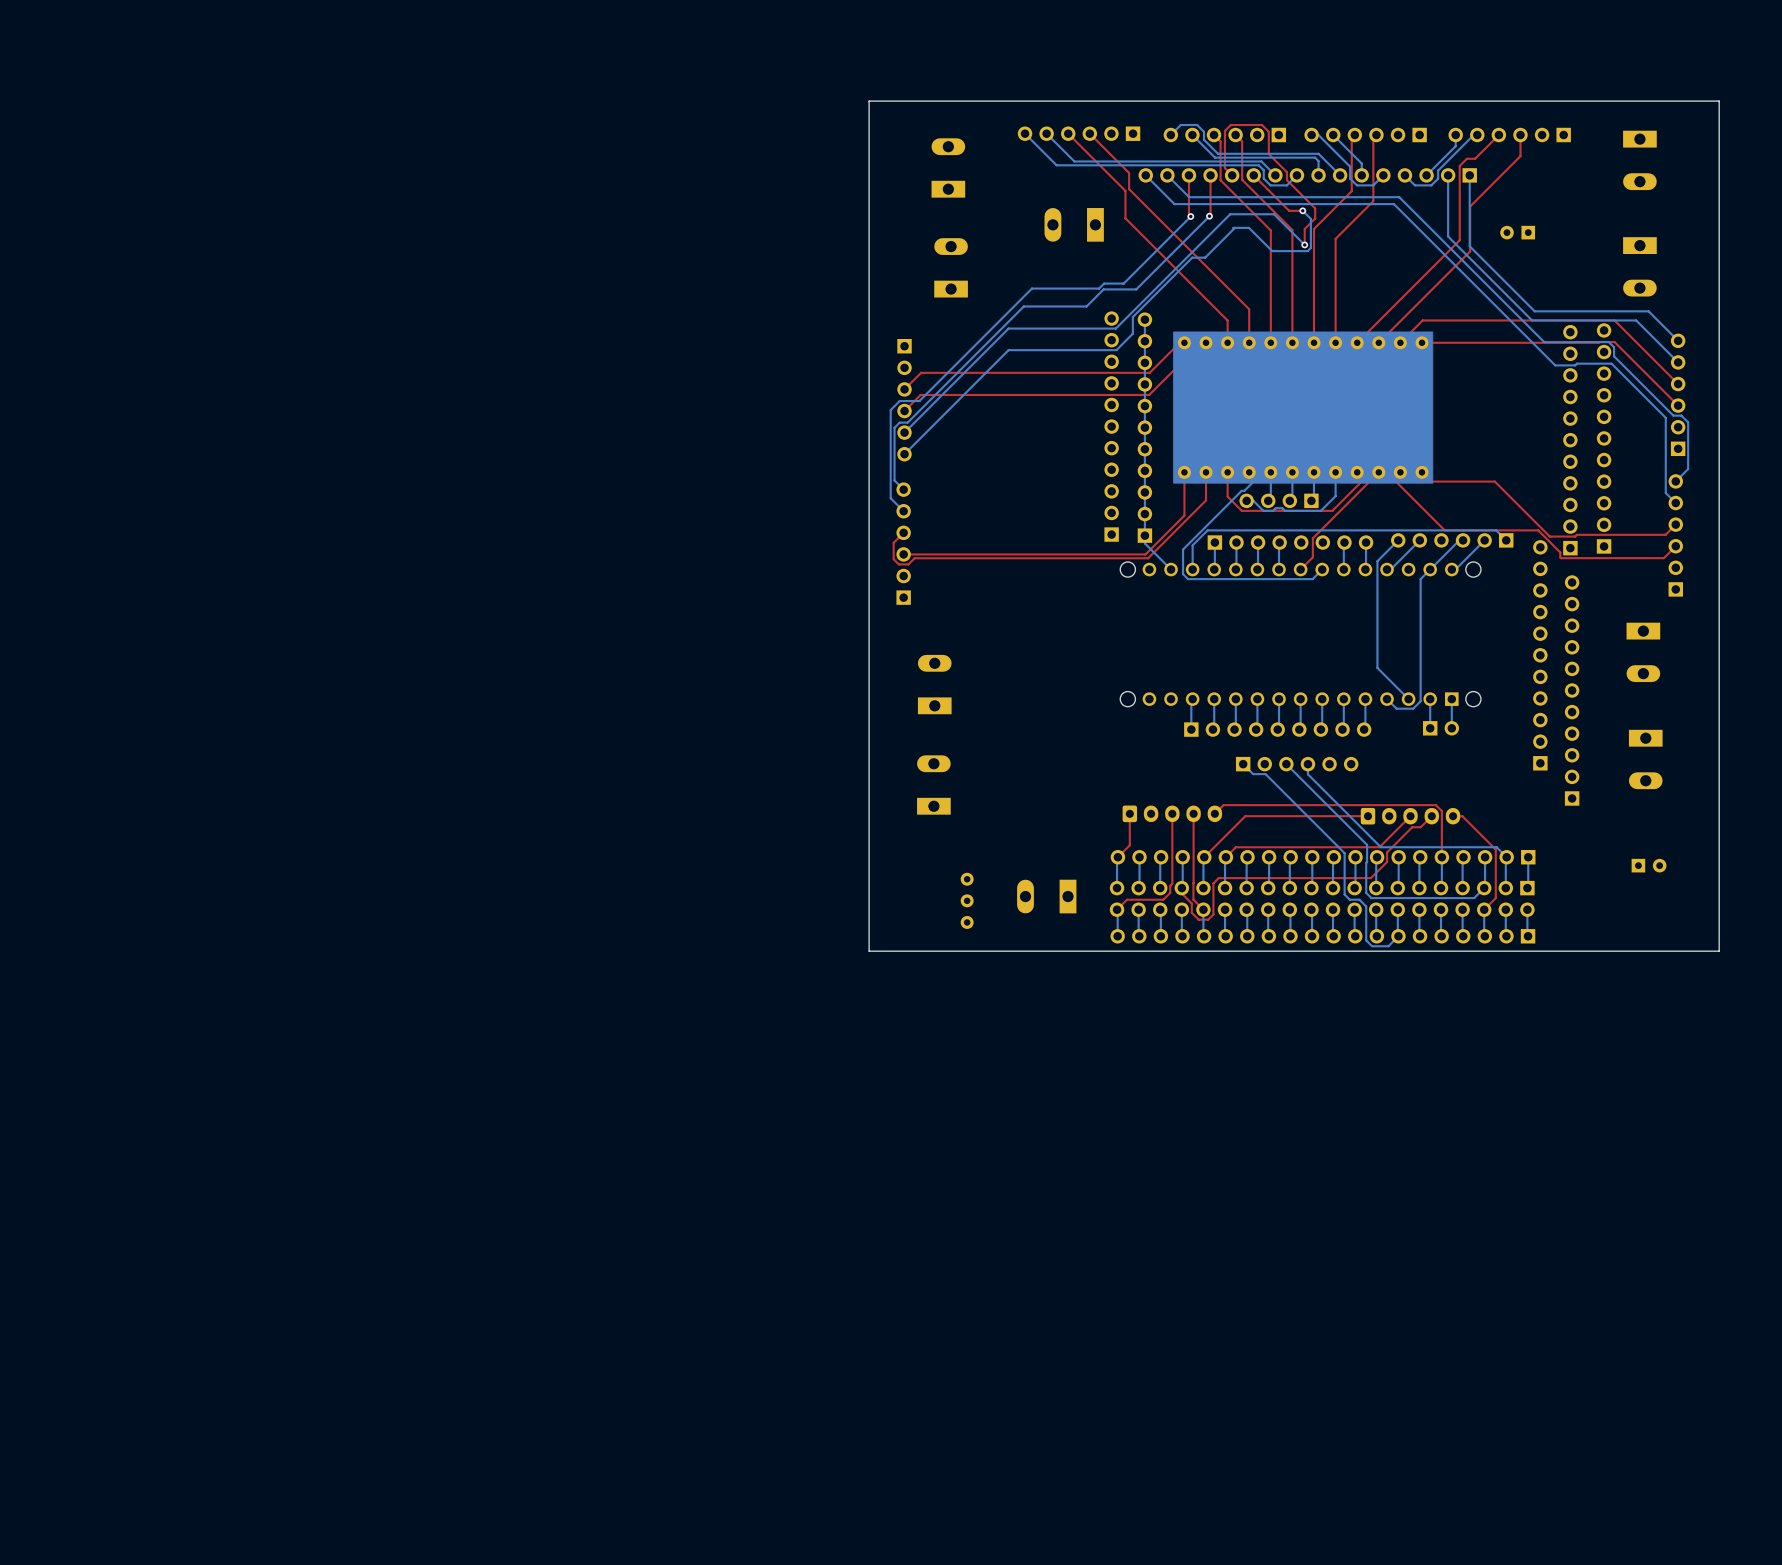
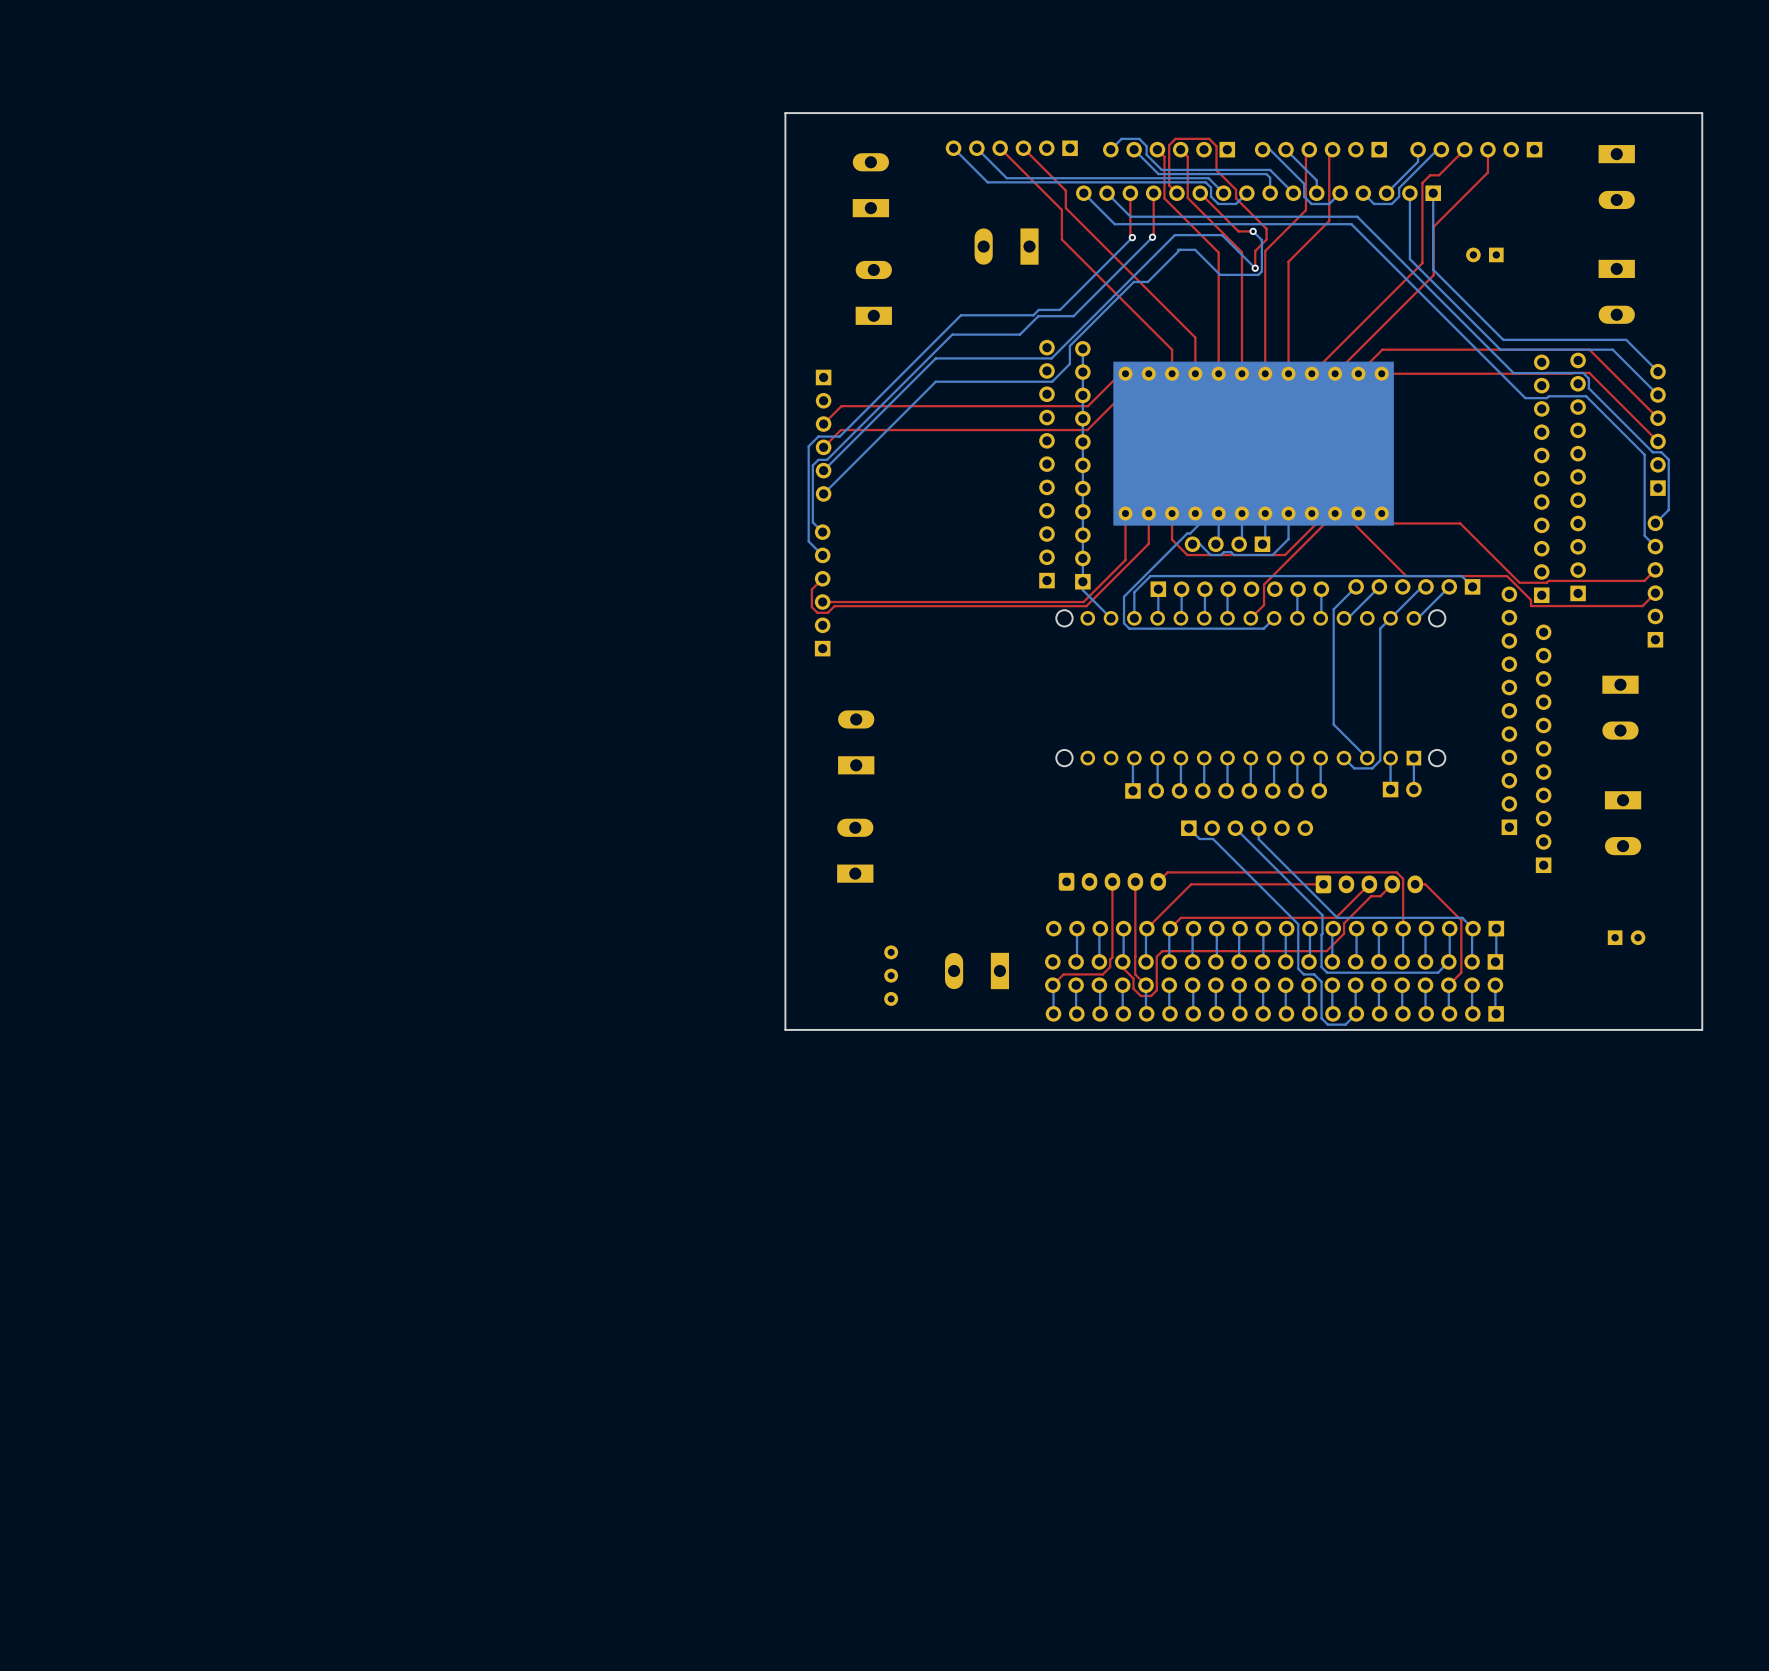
top track: (1129, 813) (1129, 845) (1117, 857) -> none
bottom track: (1117, 857) (1117, 888) -> none

